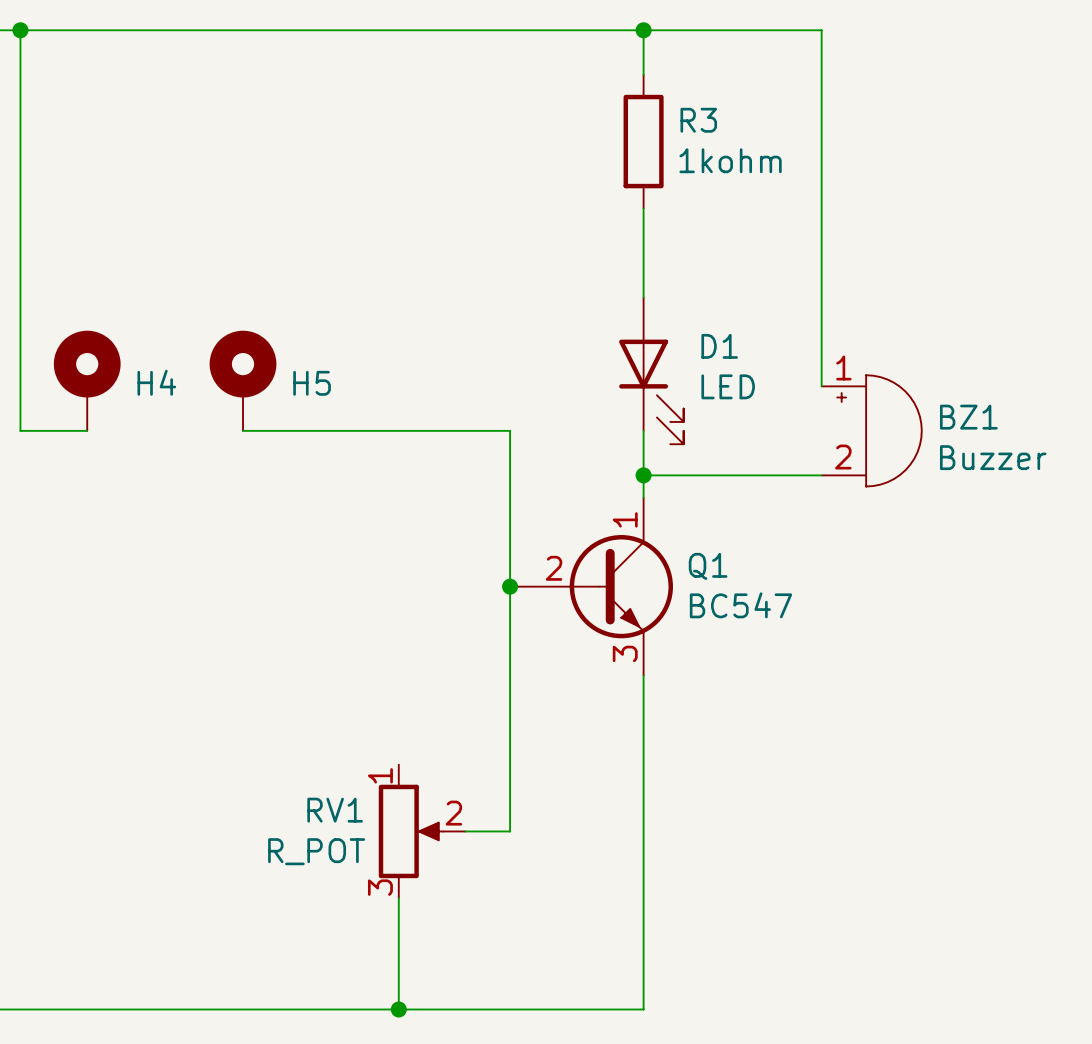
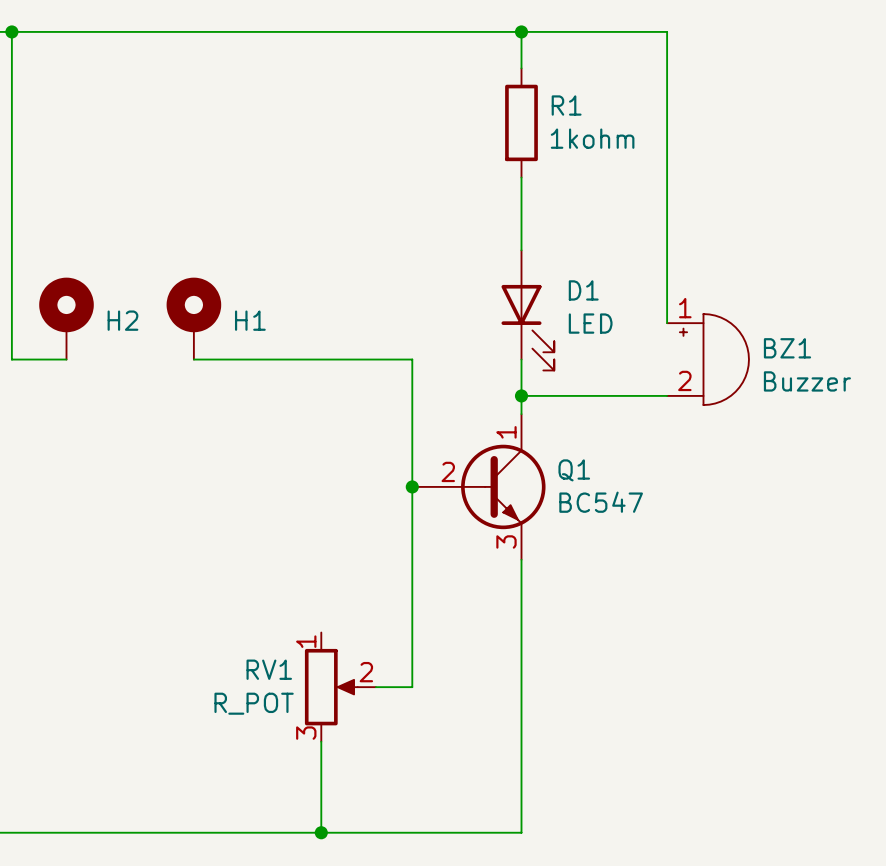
R3 name: R3 (698, 120) -> R1 (566, 105)
H4 name: H4 (156, 382) -> H2 (122, 320)
H5 name: H5 (312, 383) -> H1 (250, 320)

